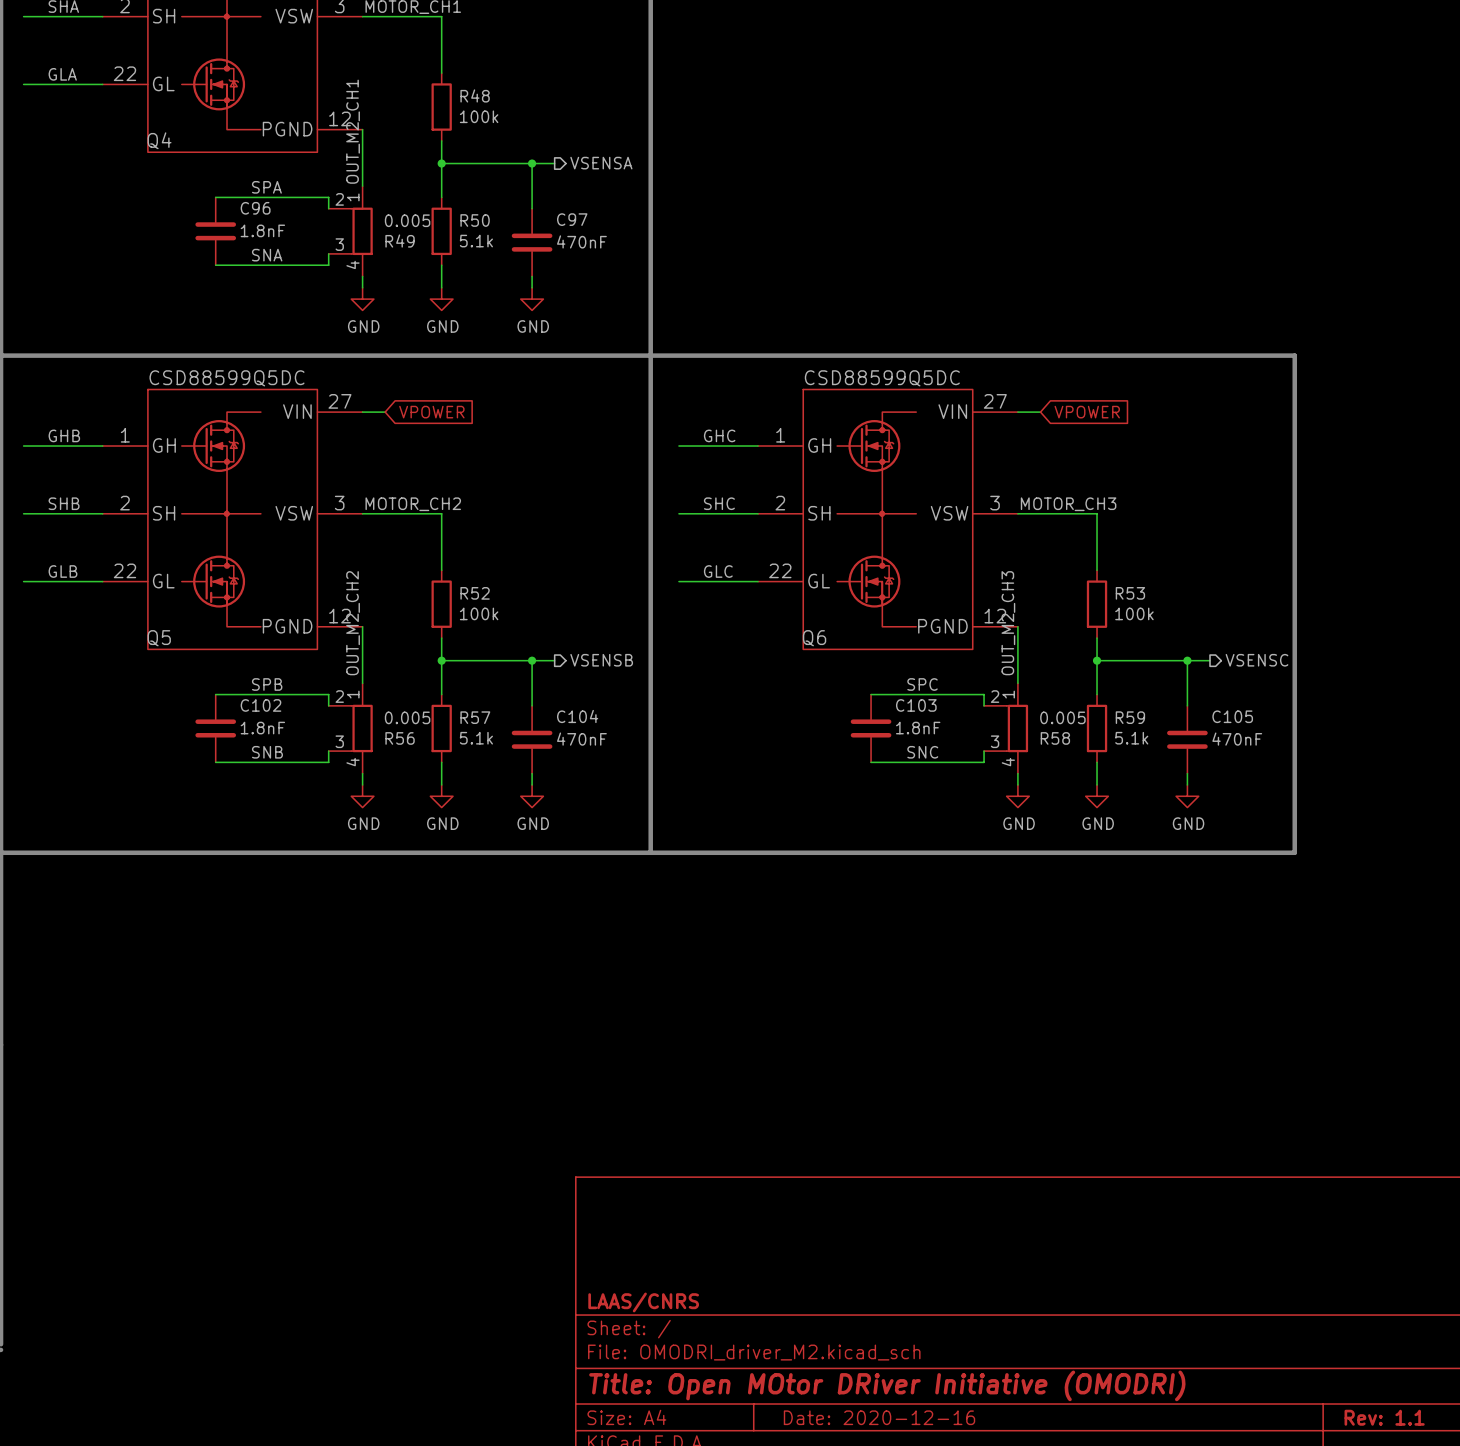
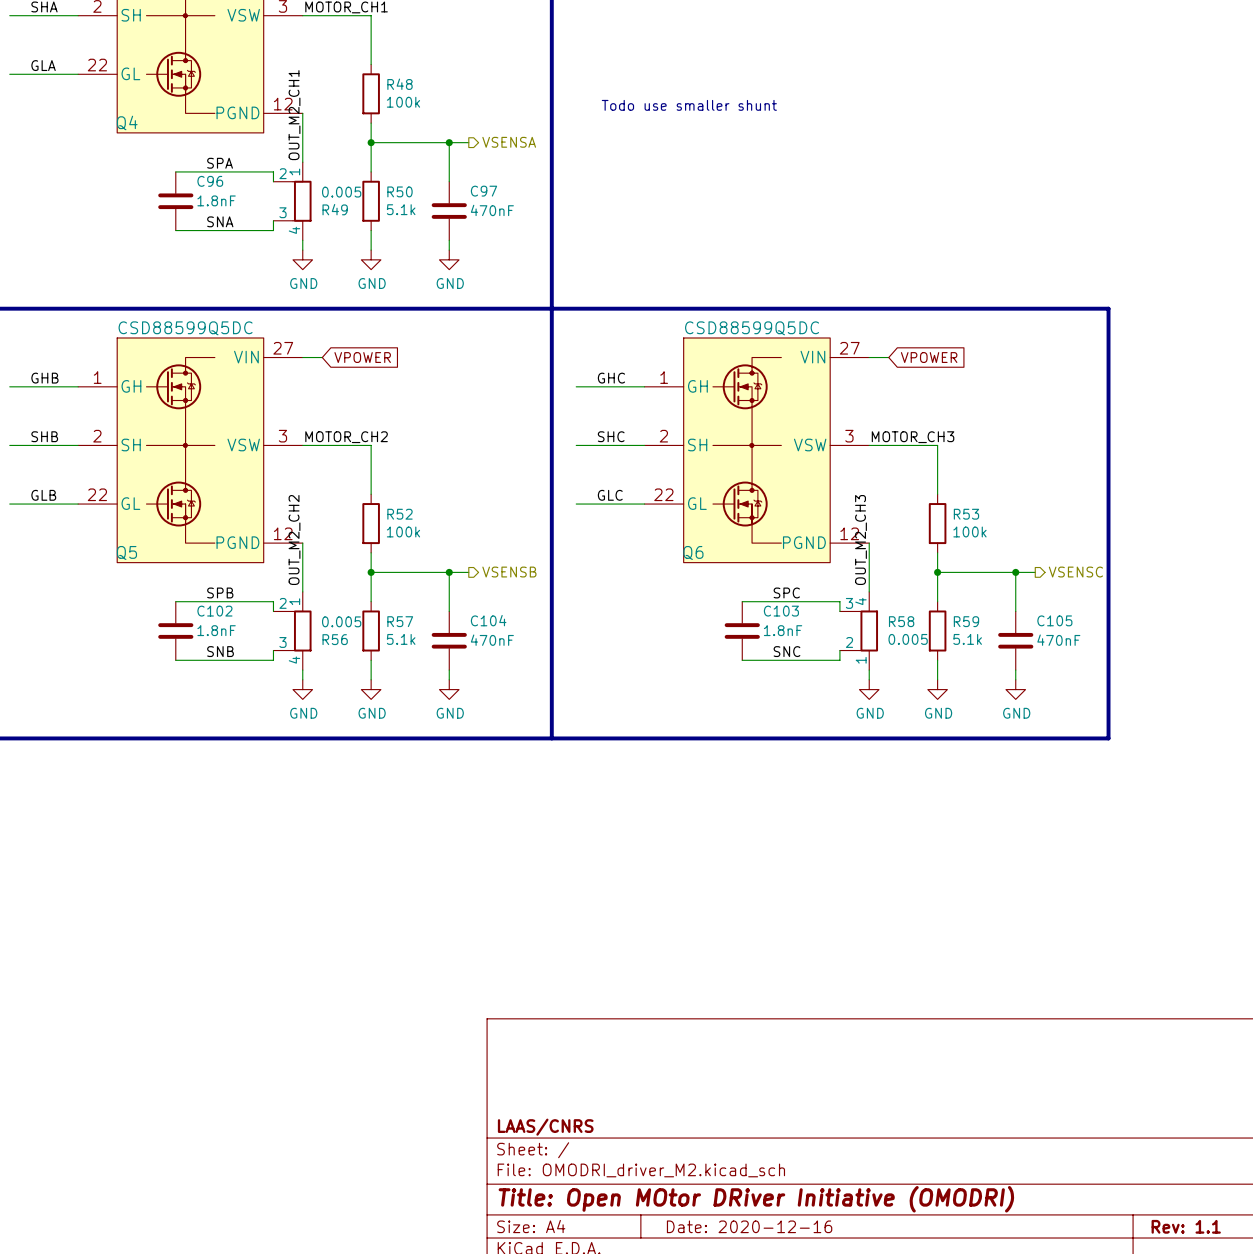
text: none -> Todo use smaller shunt (689, 105)
R58 flip: as is (1017, 728) -> up-down (868, 631)

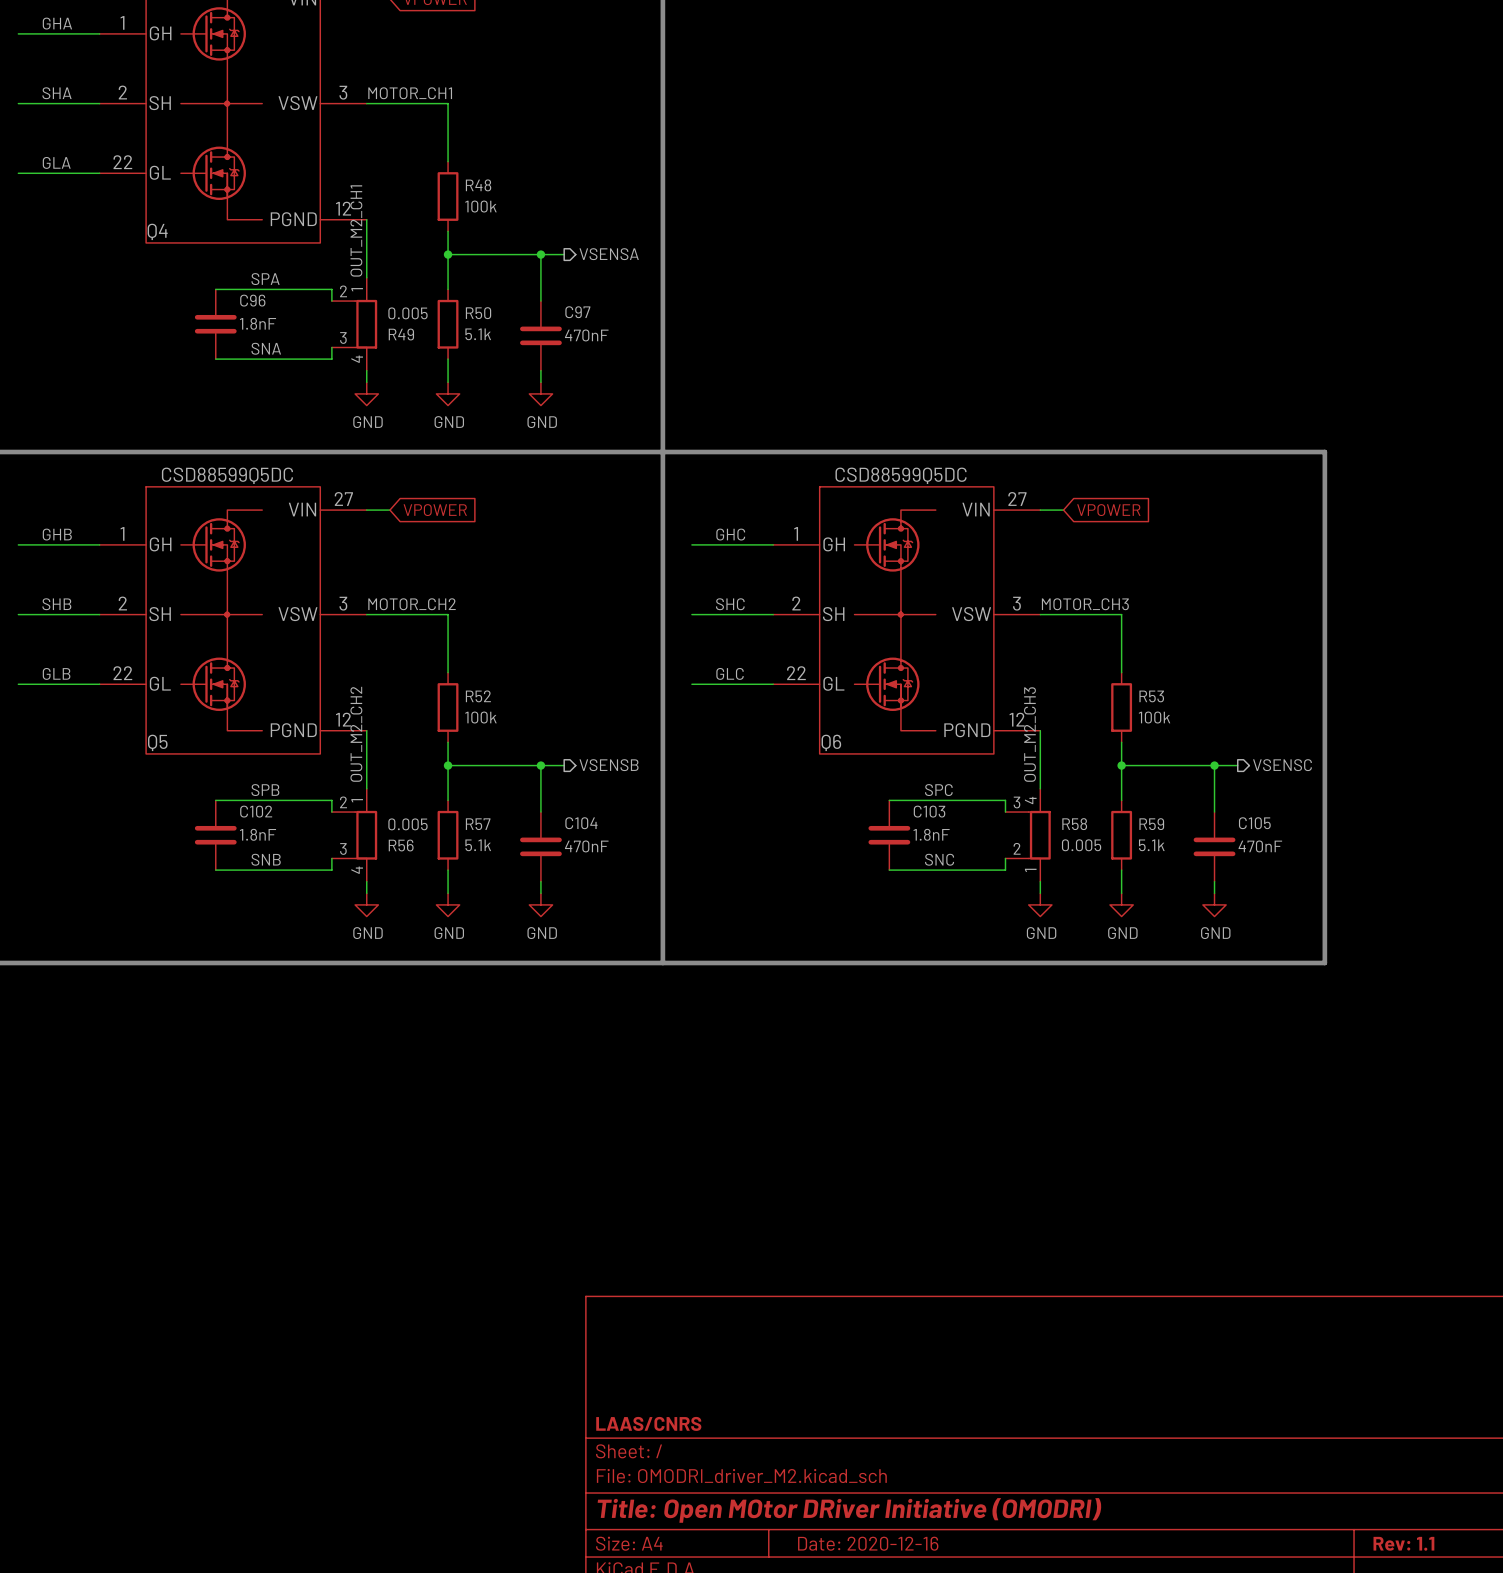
text: Todo use smaller shunt (689, 105) -> none

